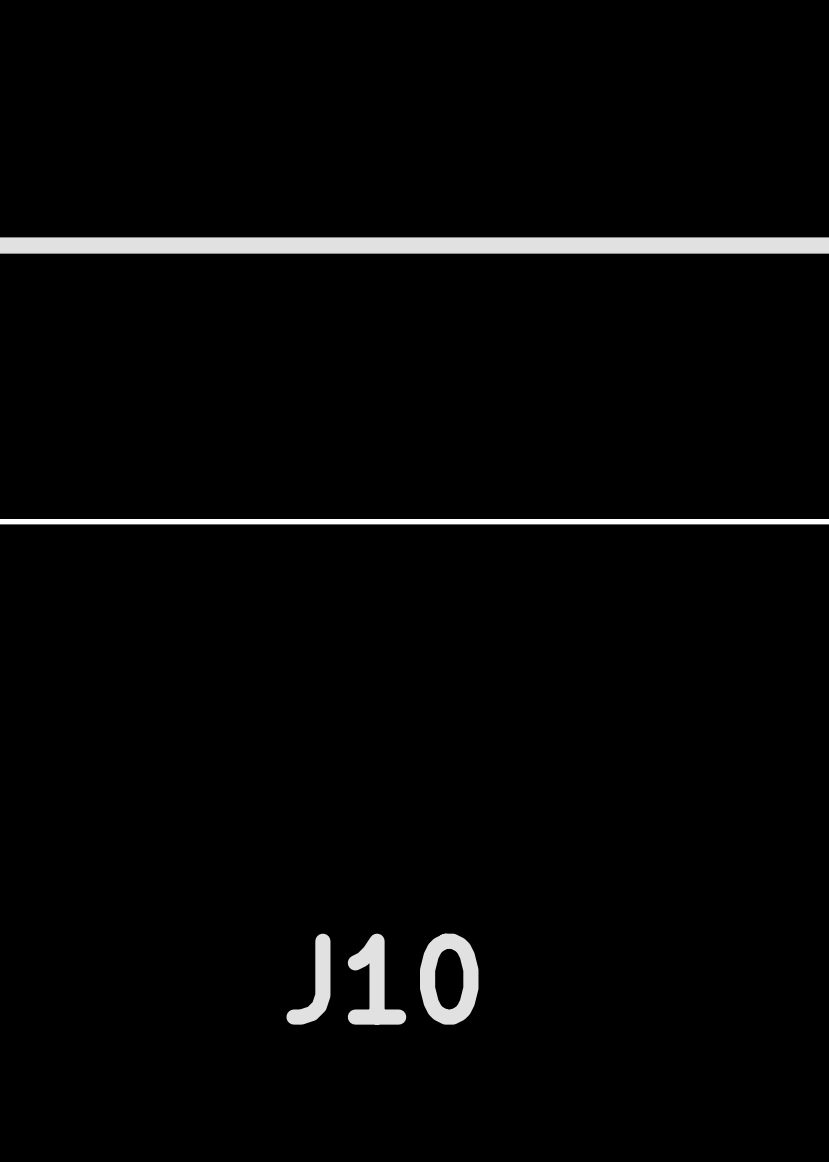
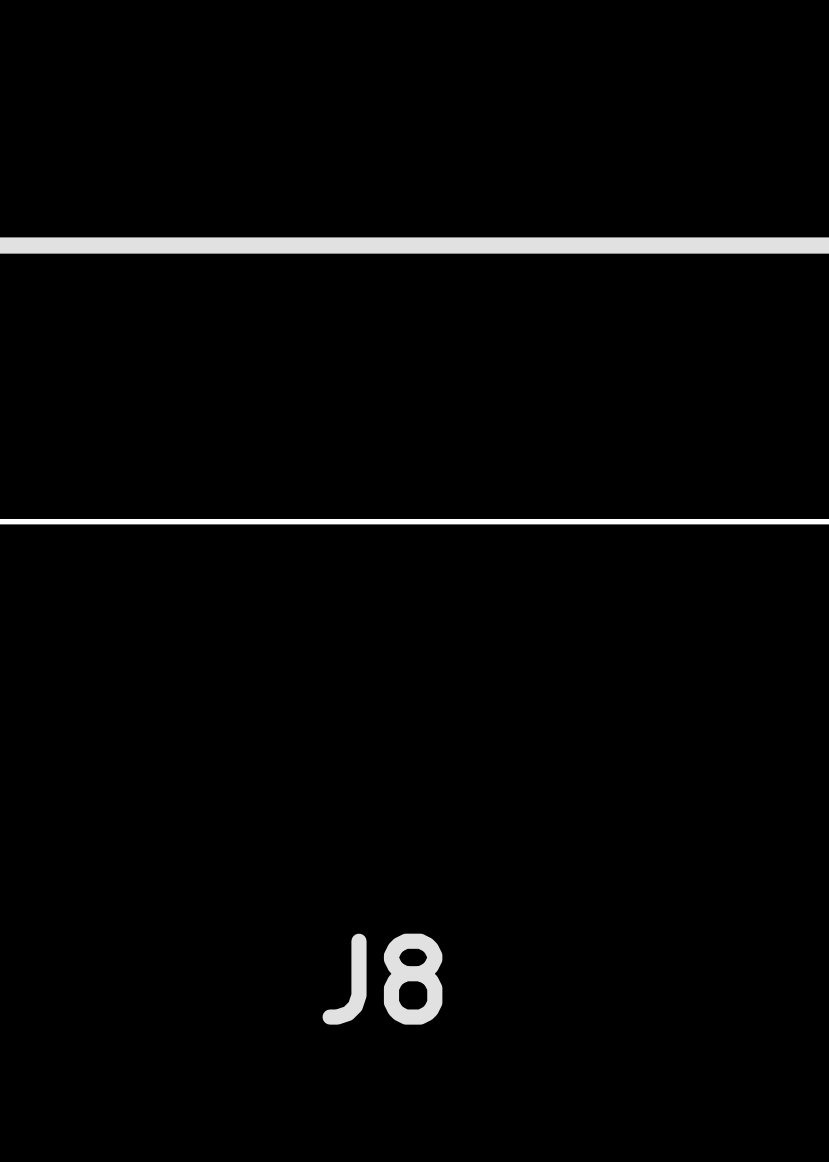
J10 name: J10 (382, 979) -> J8 (382, 979)

